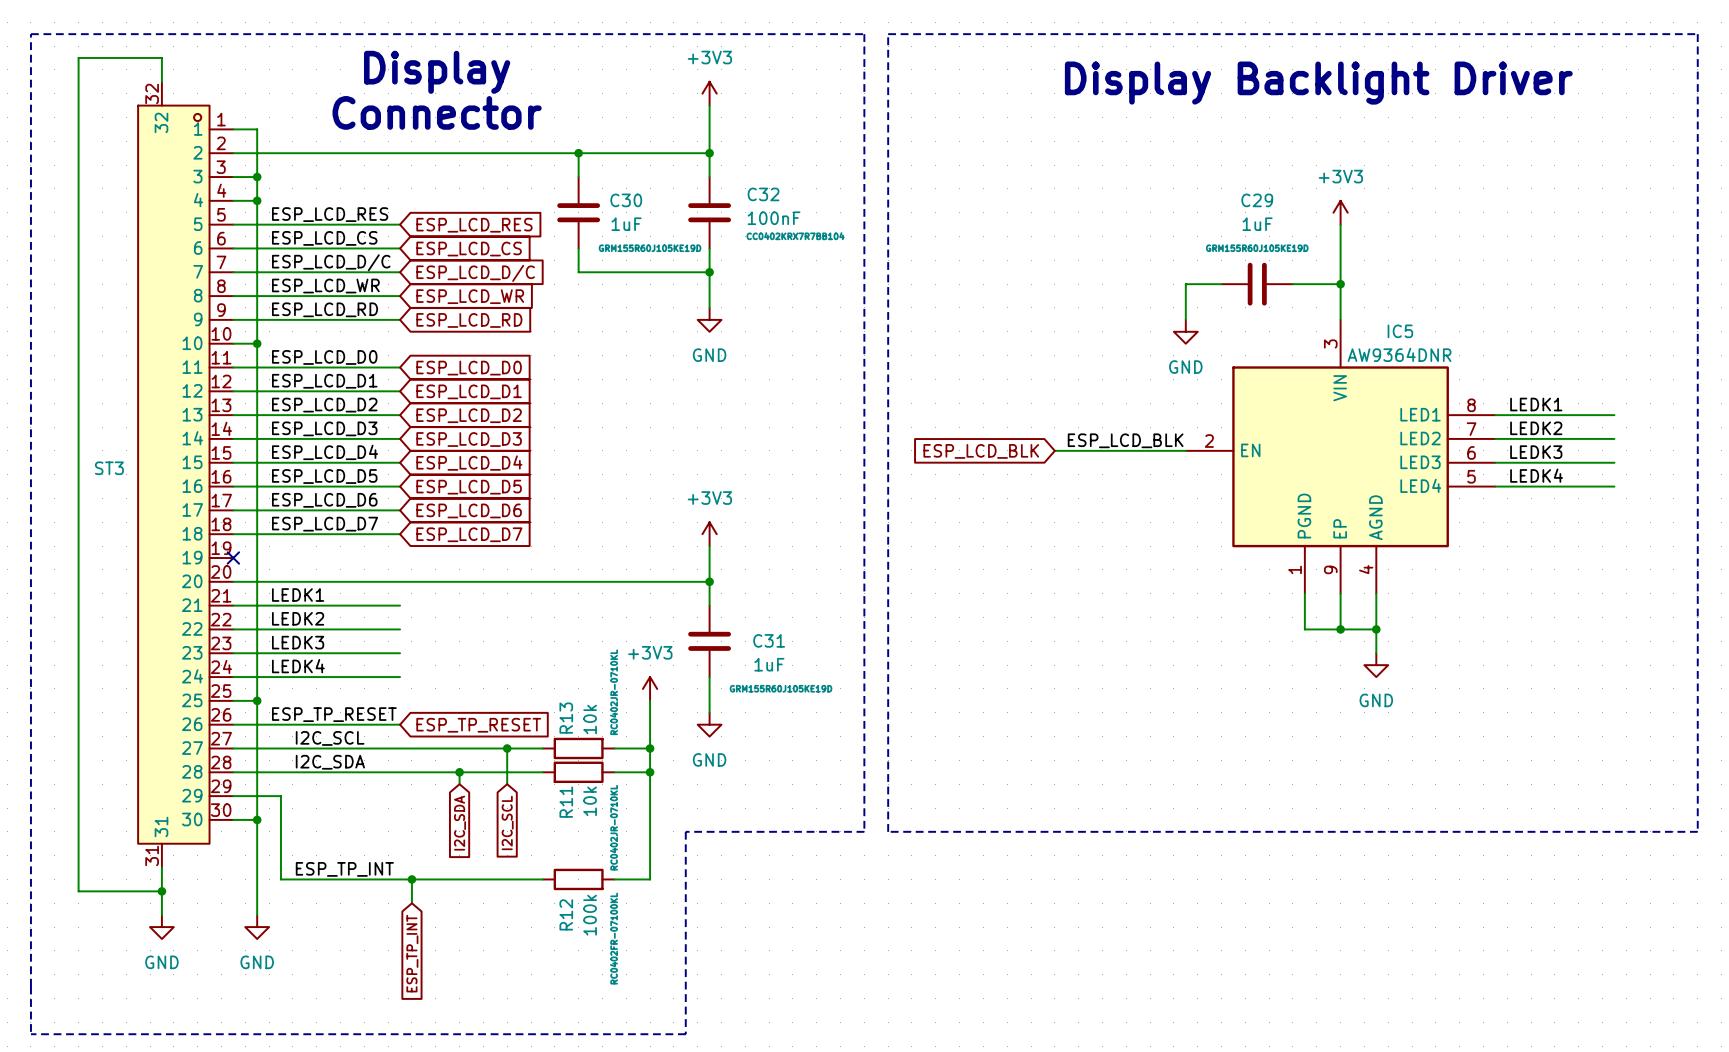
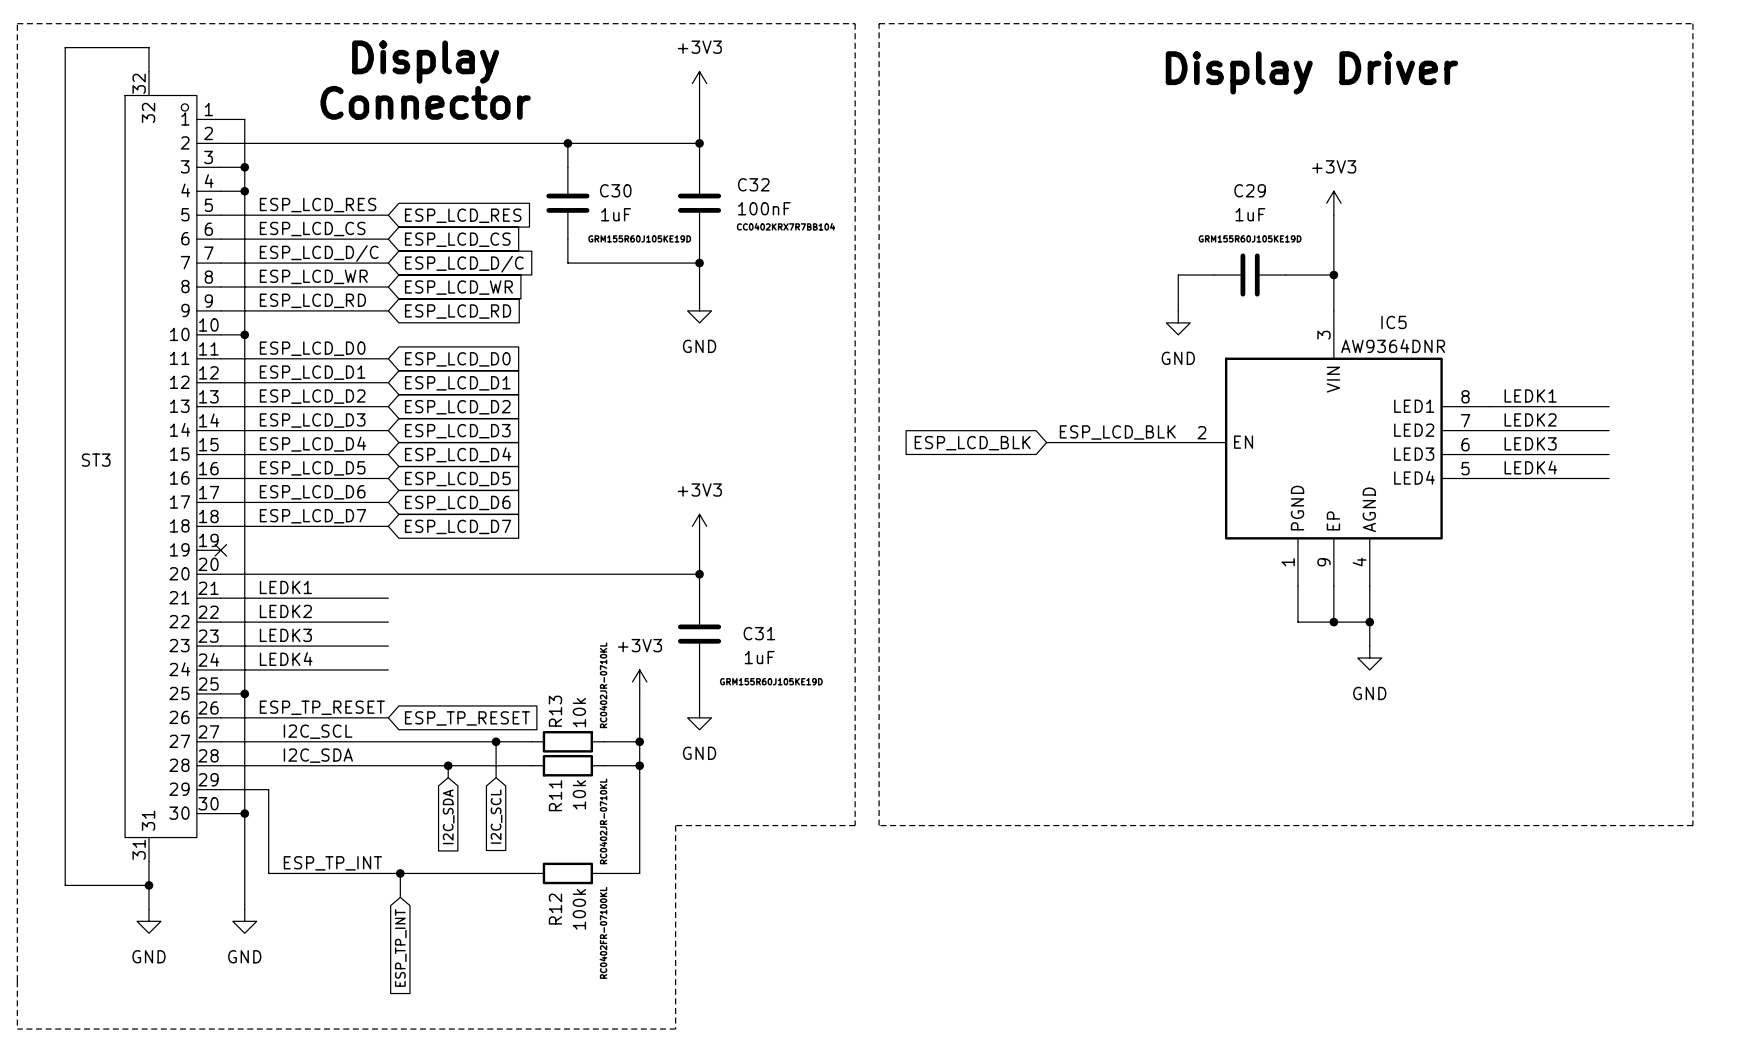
text: Display Backlight Driver (1318, 83) -> Display Driver (1311, 72)

